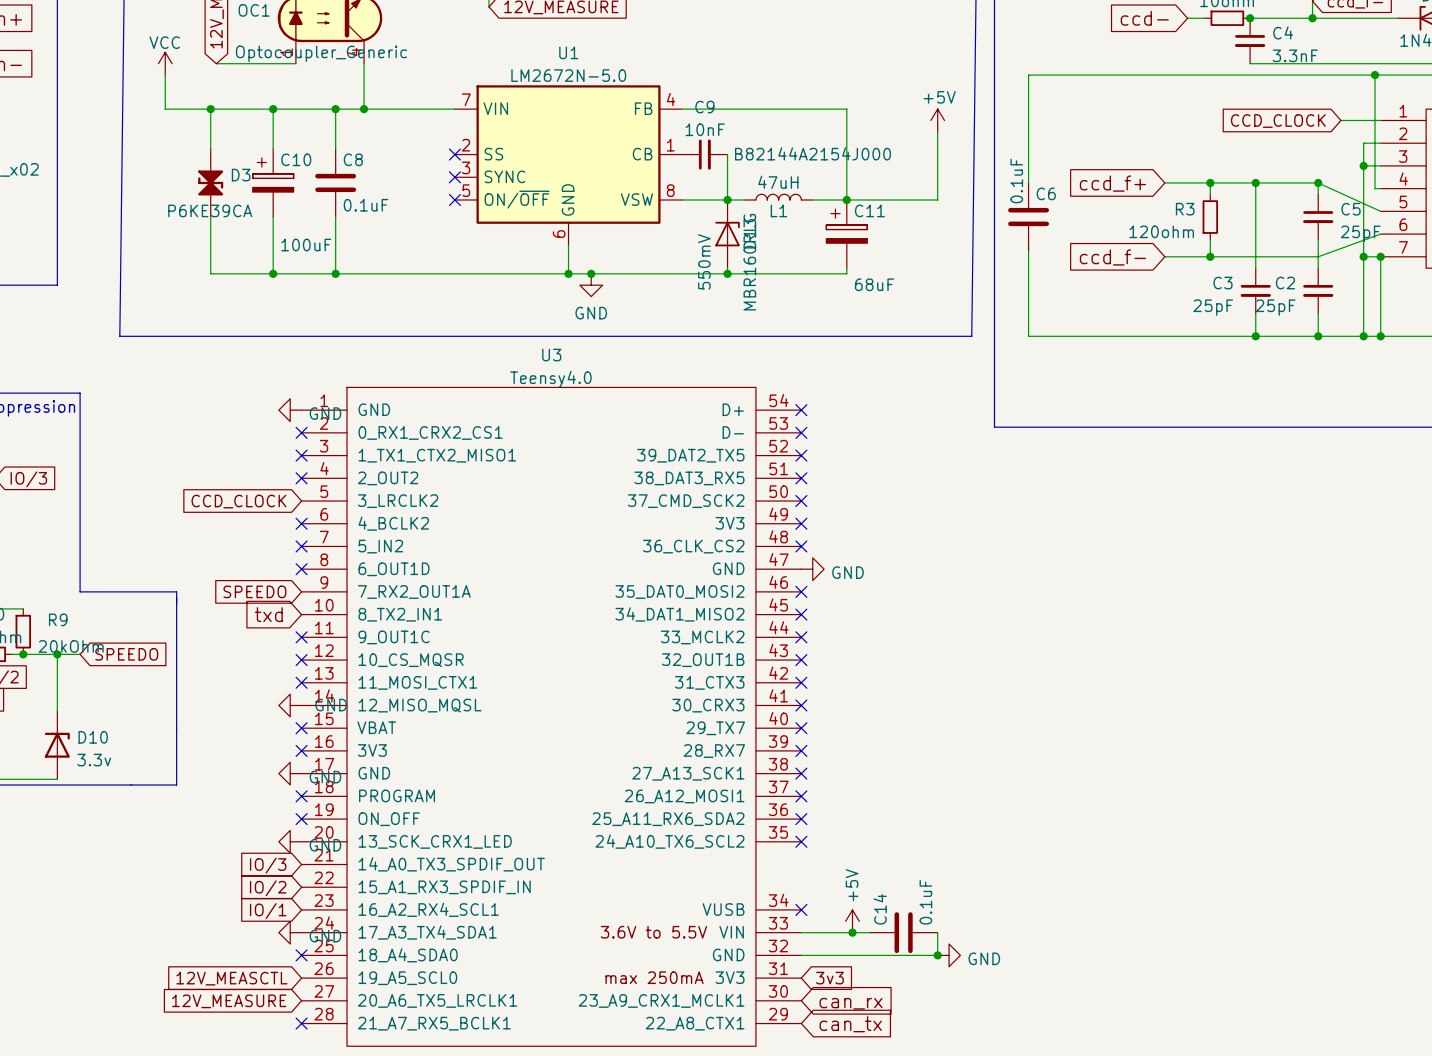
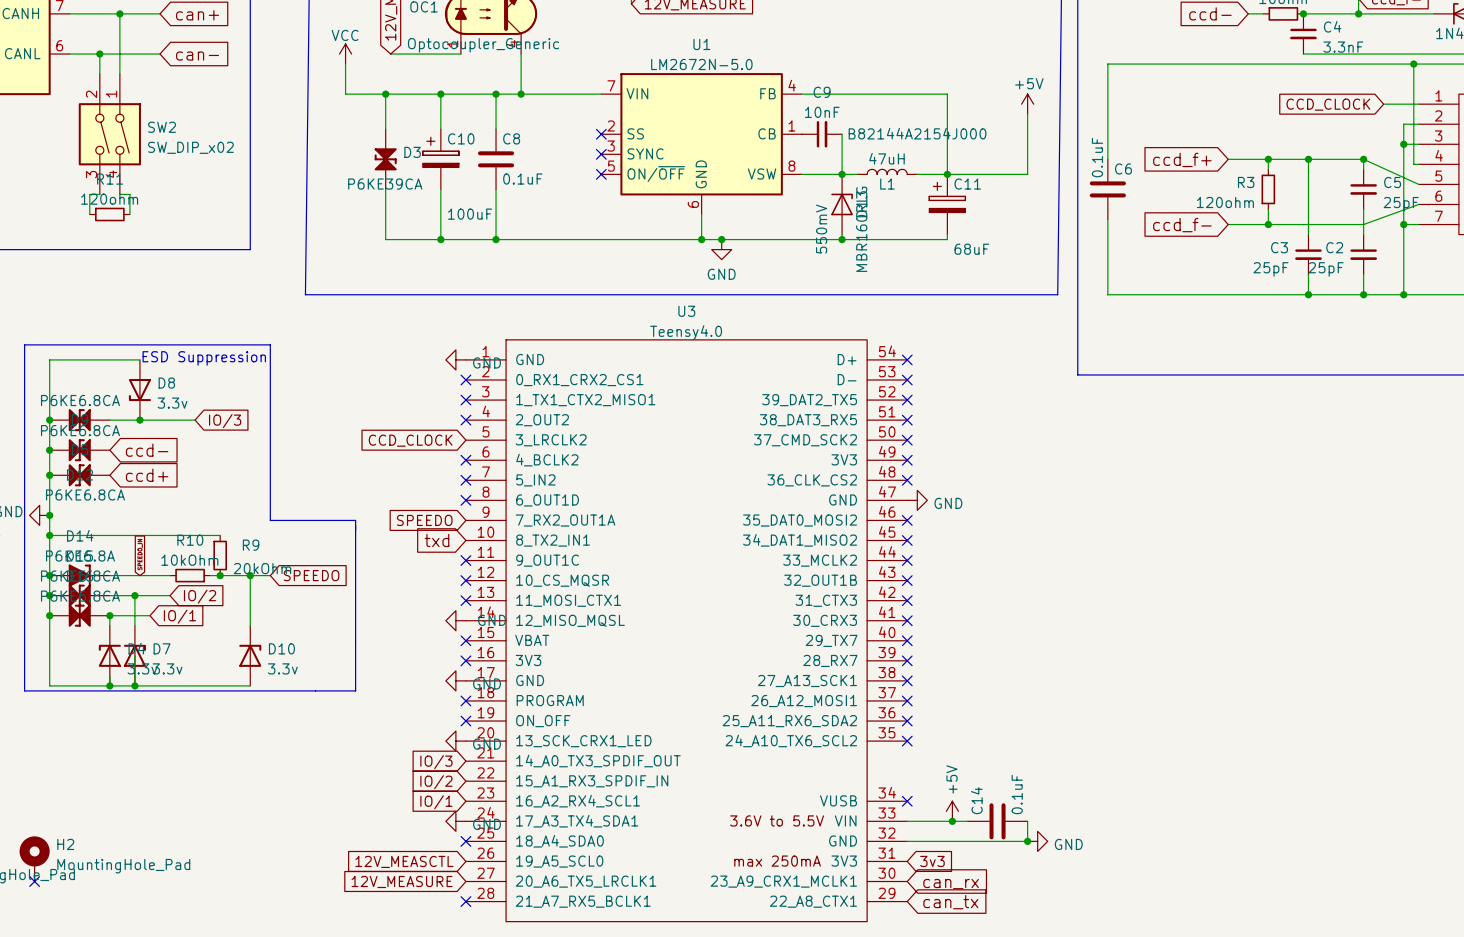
wire: (1380, 256) (1380, 336) -> none
junction: (1380, 256) -> none
junction: (1380, 336) -> none

